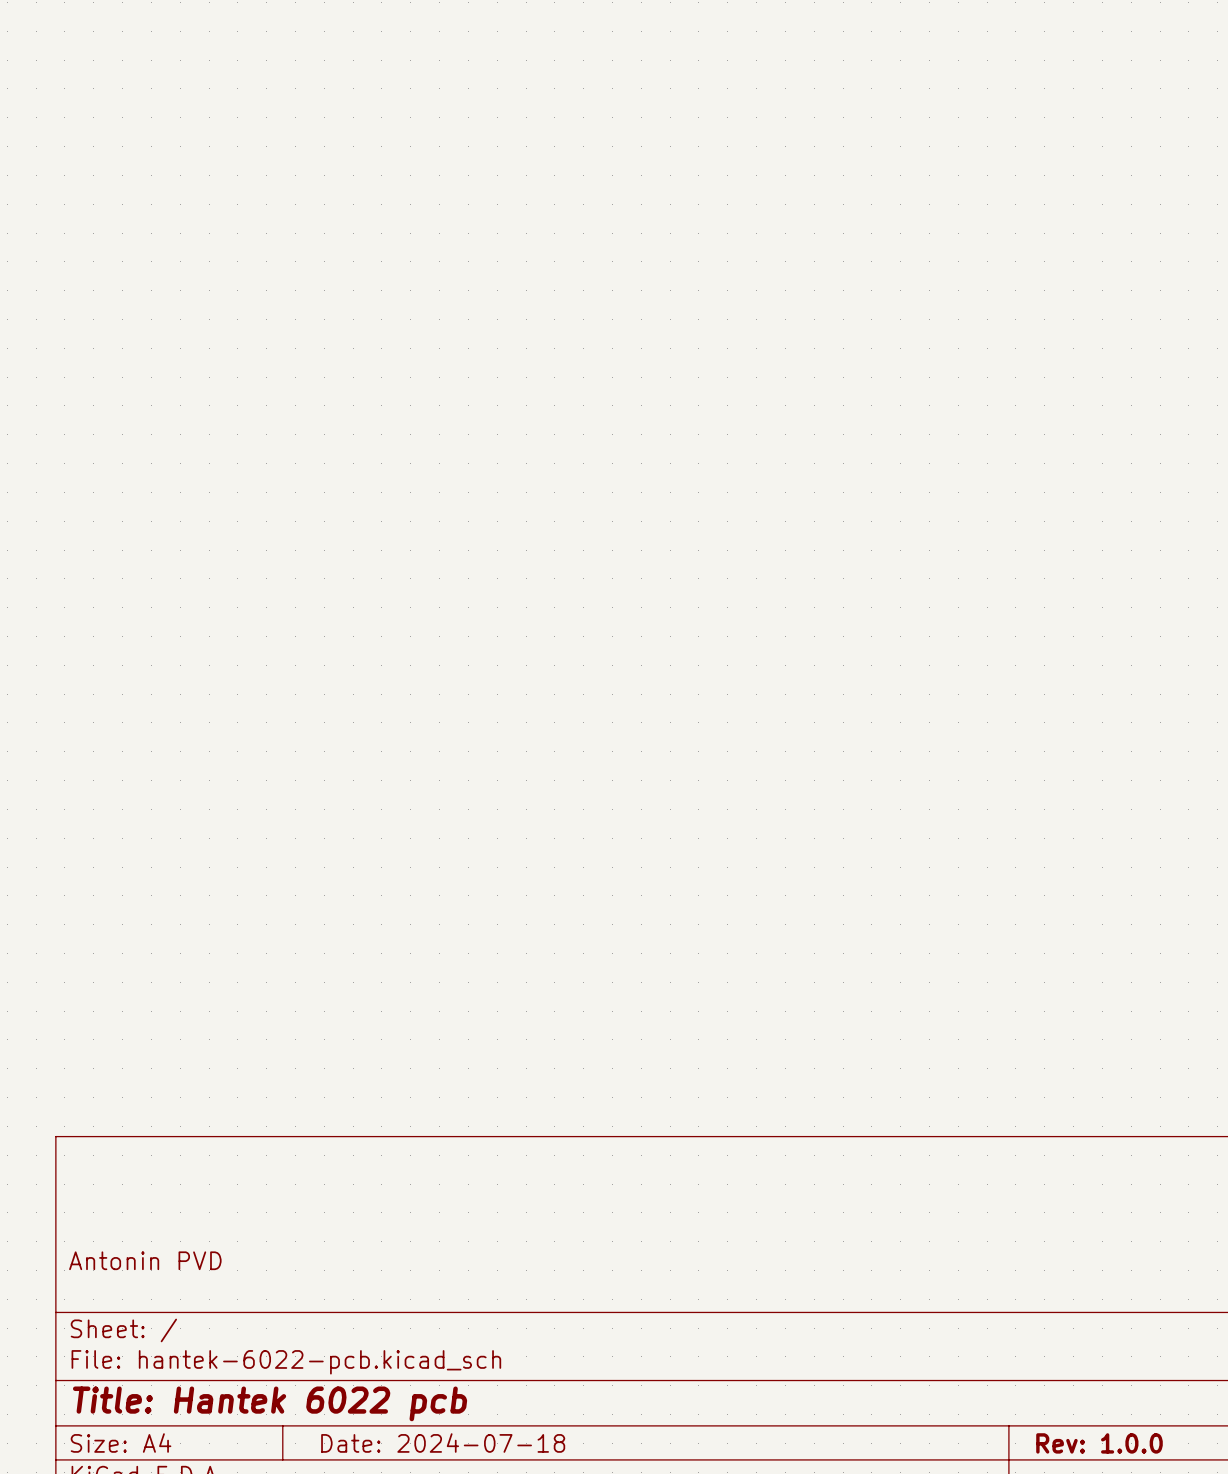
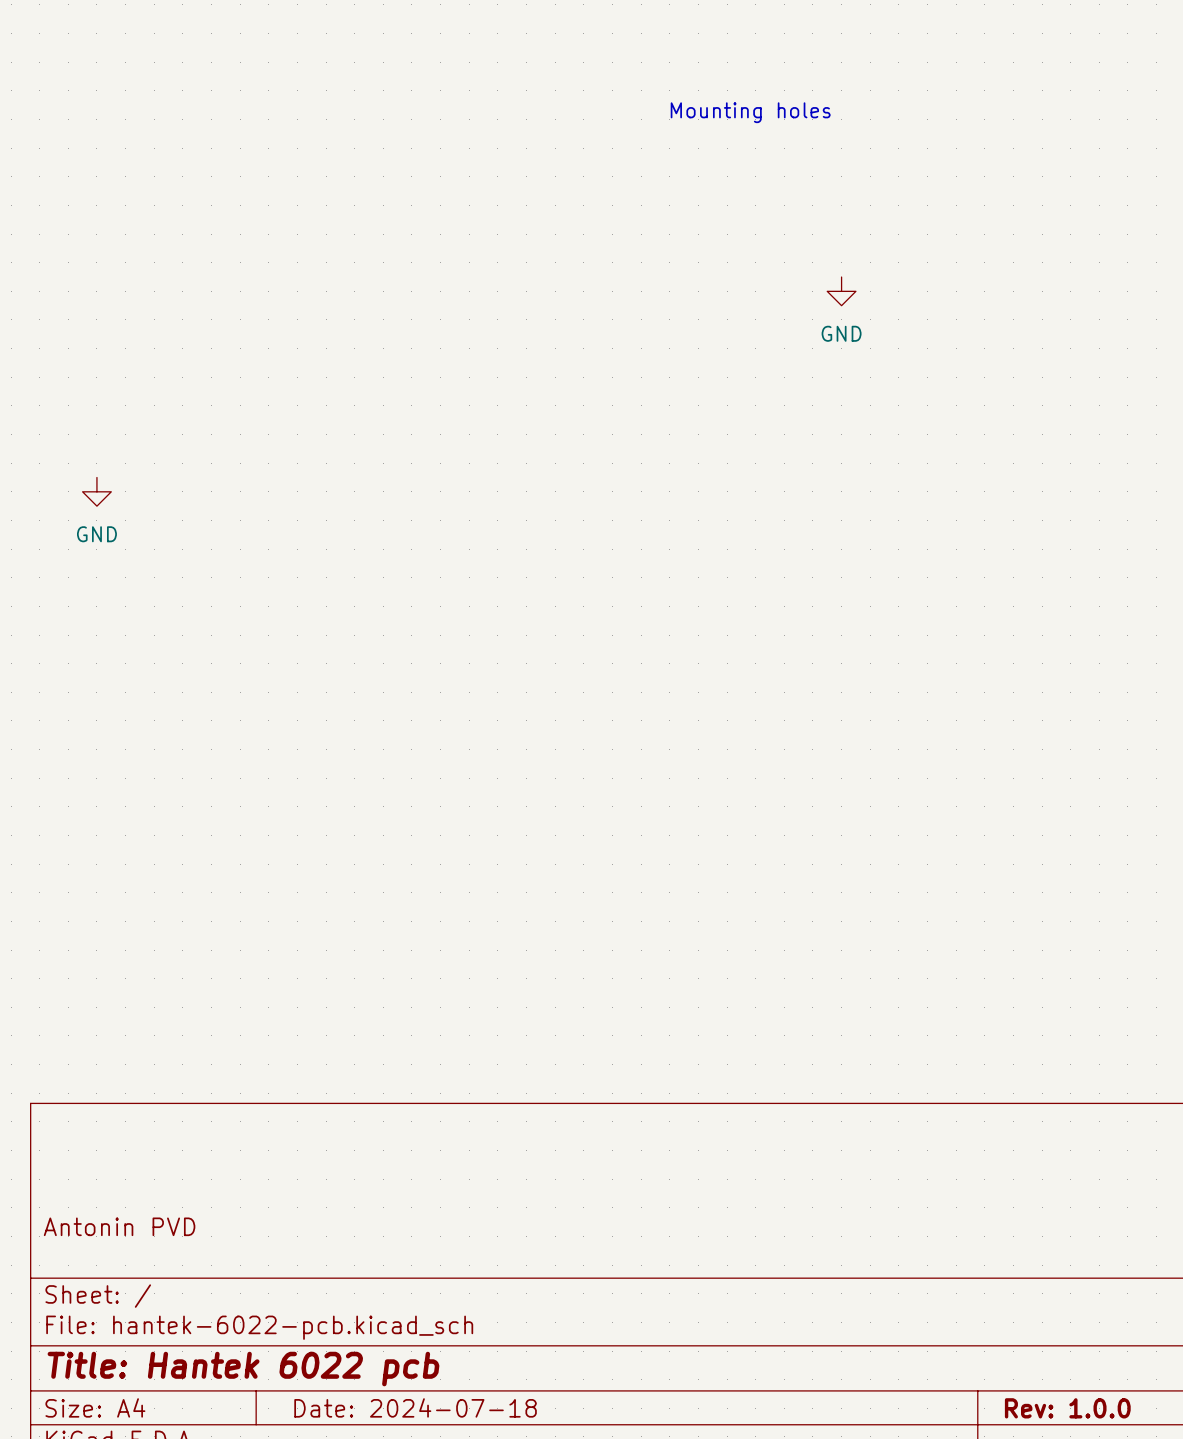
text: none -> Mounting holes (750, 112)
power symbol: none -> GND (841, 291)
power symbol: none -> GND (96, 491)

